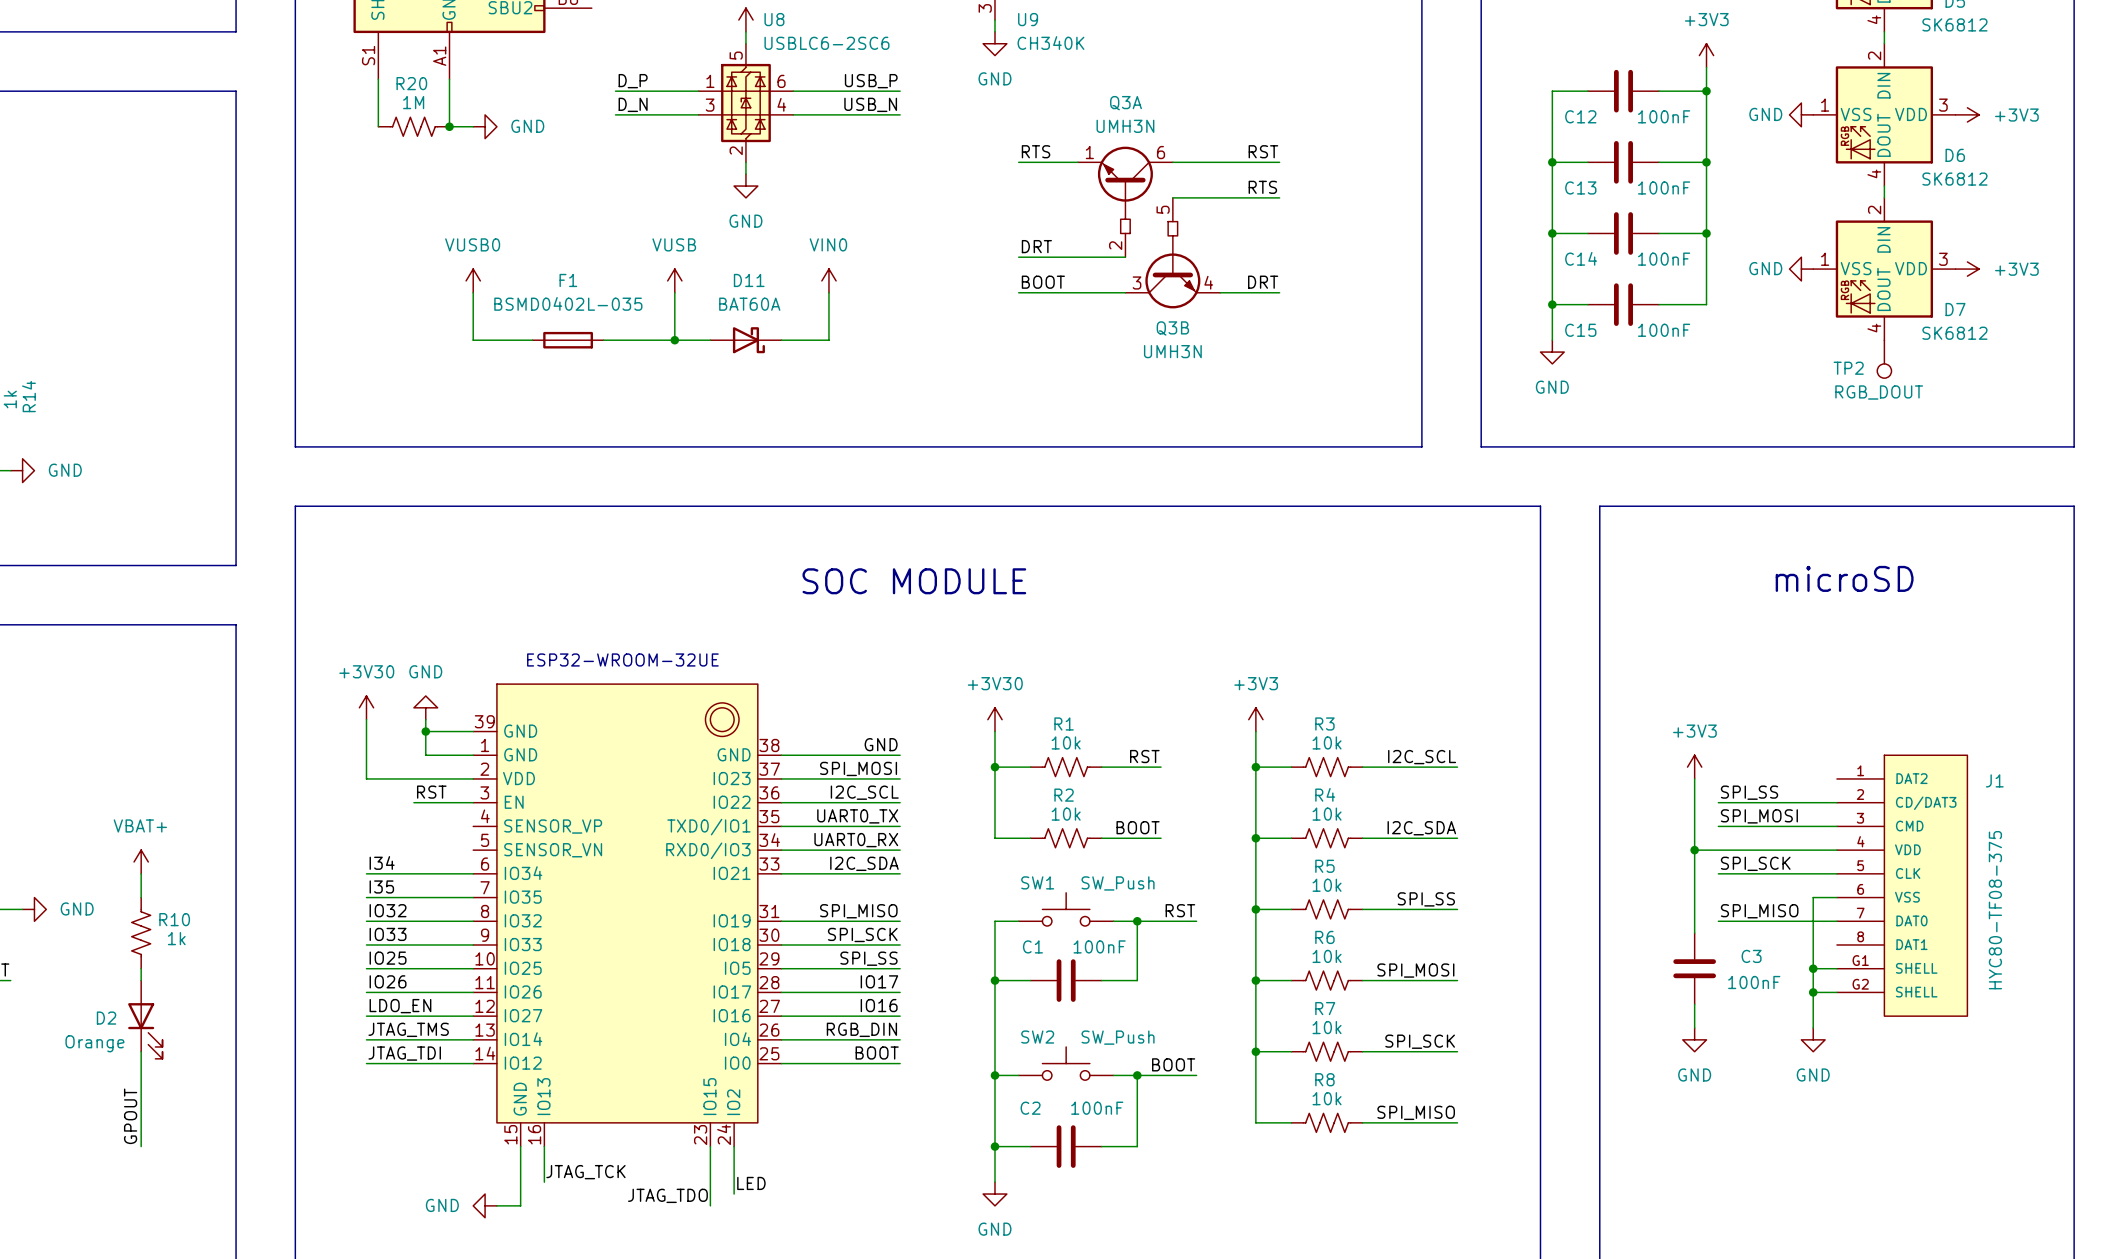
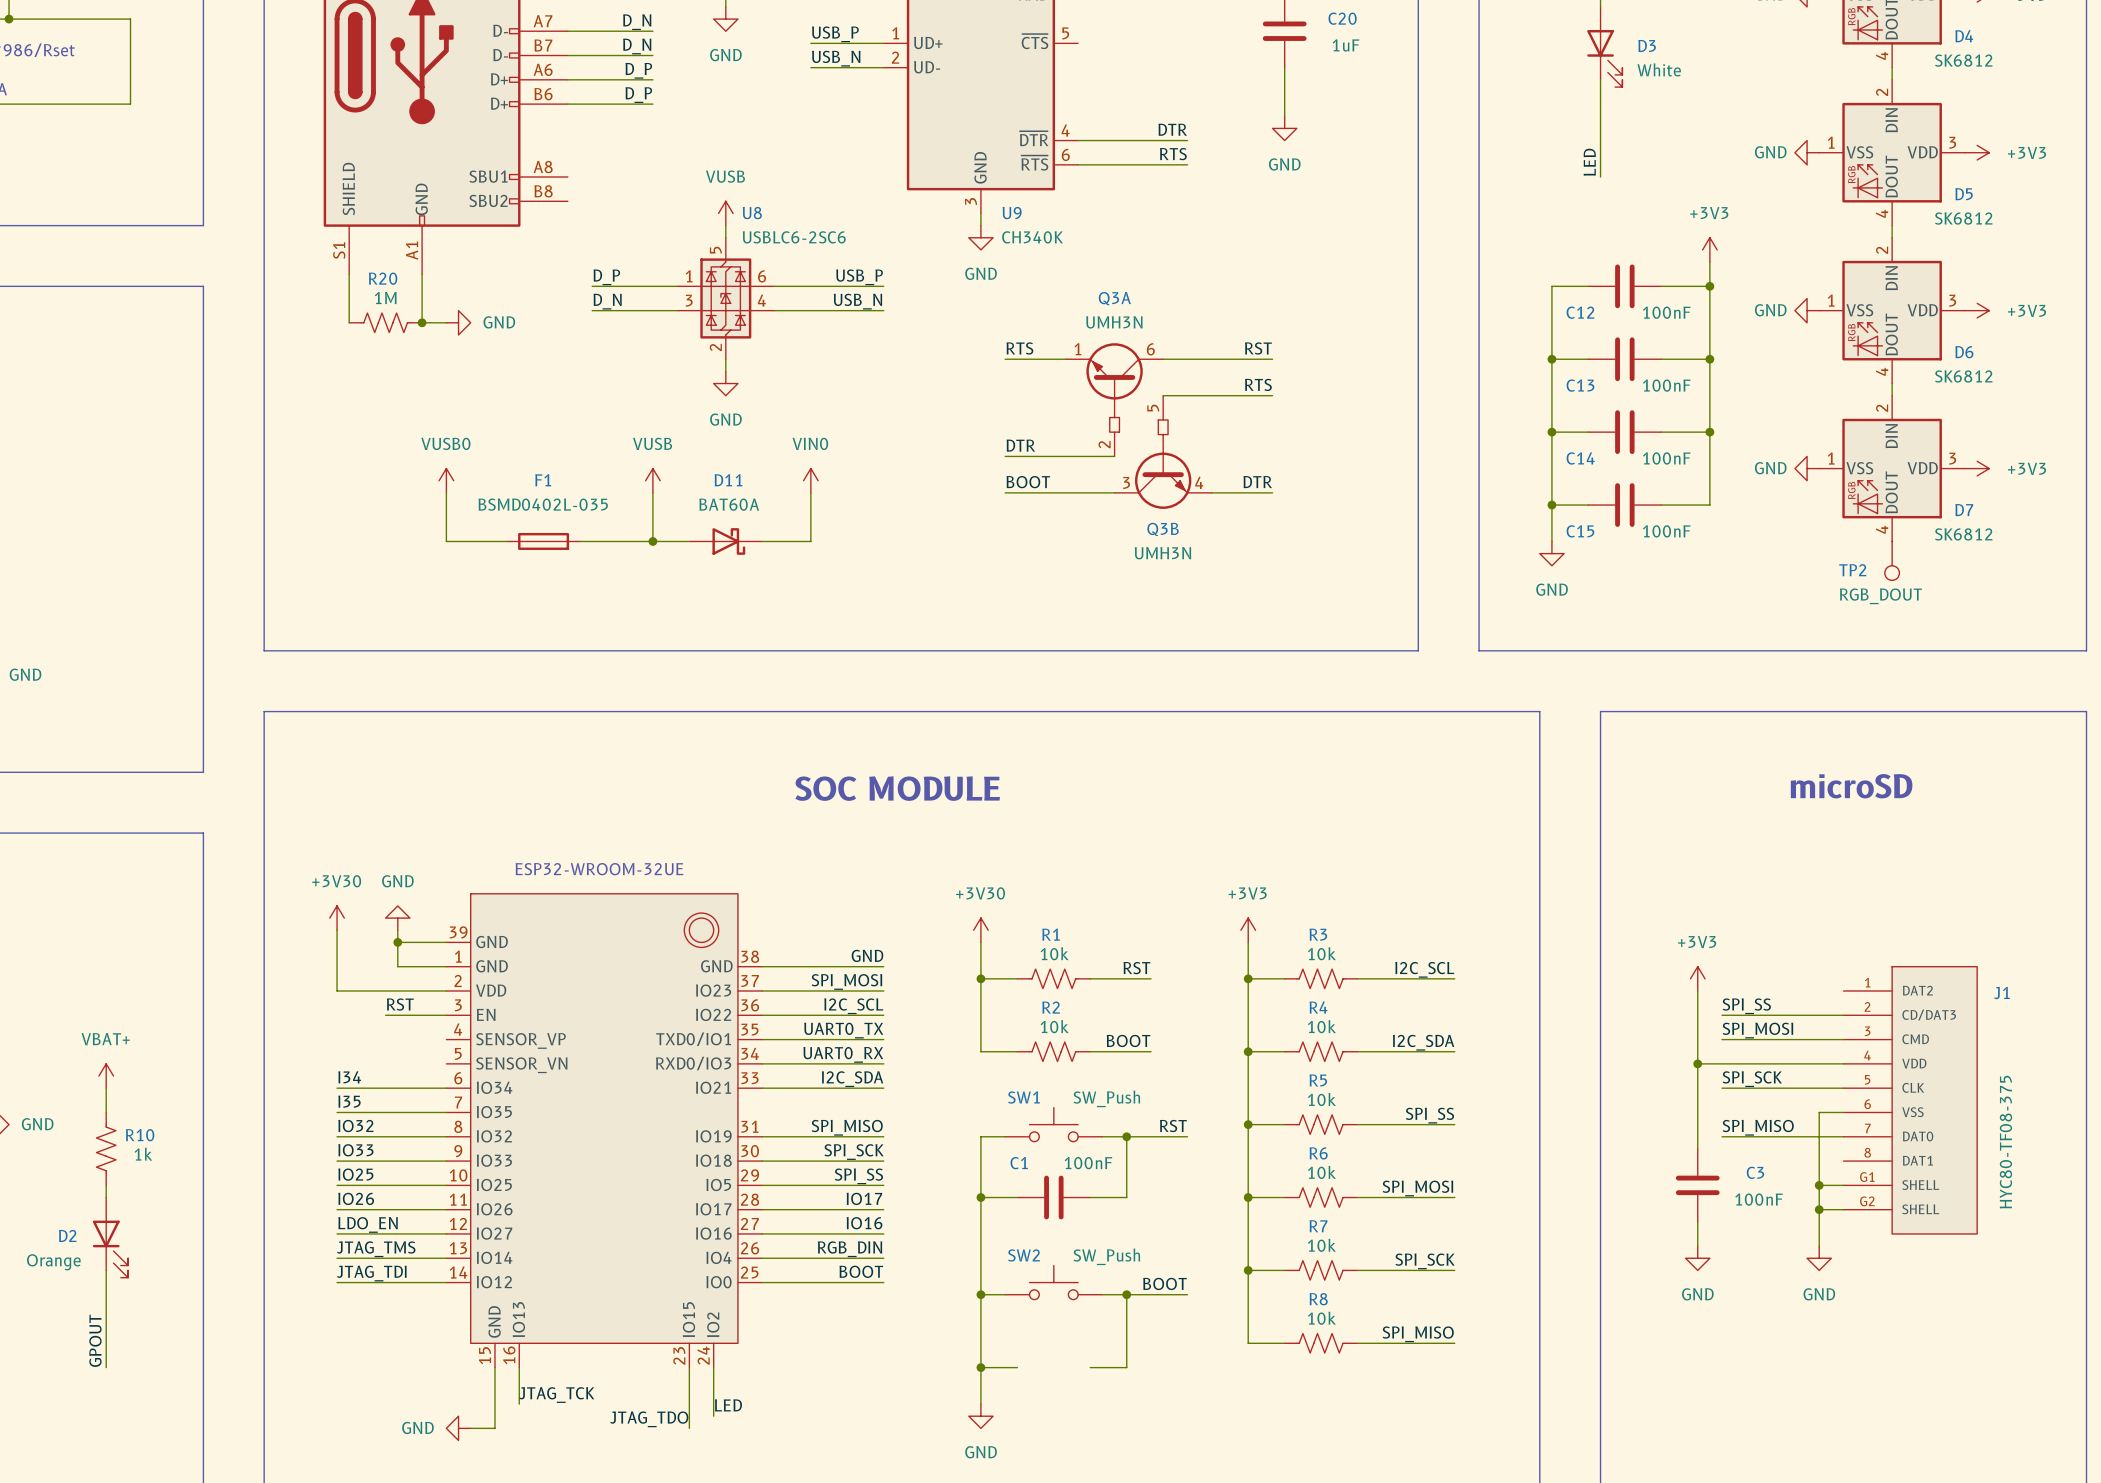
label: DRT (1036, 246) -> DTR (1020, 445)
label: DRT (1263, 282) -> DTR (1257, 482)
C2: 100nF (1066, 1146) -> none

